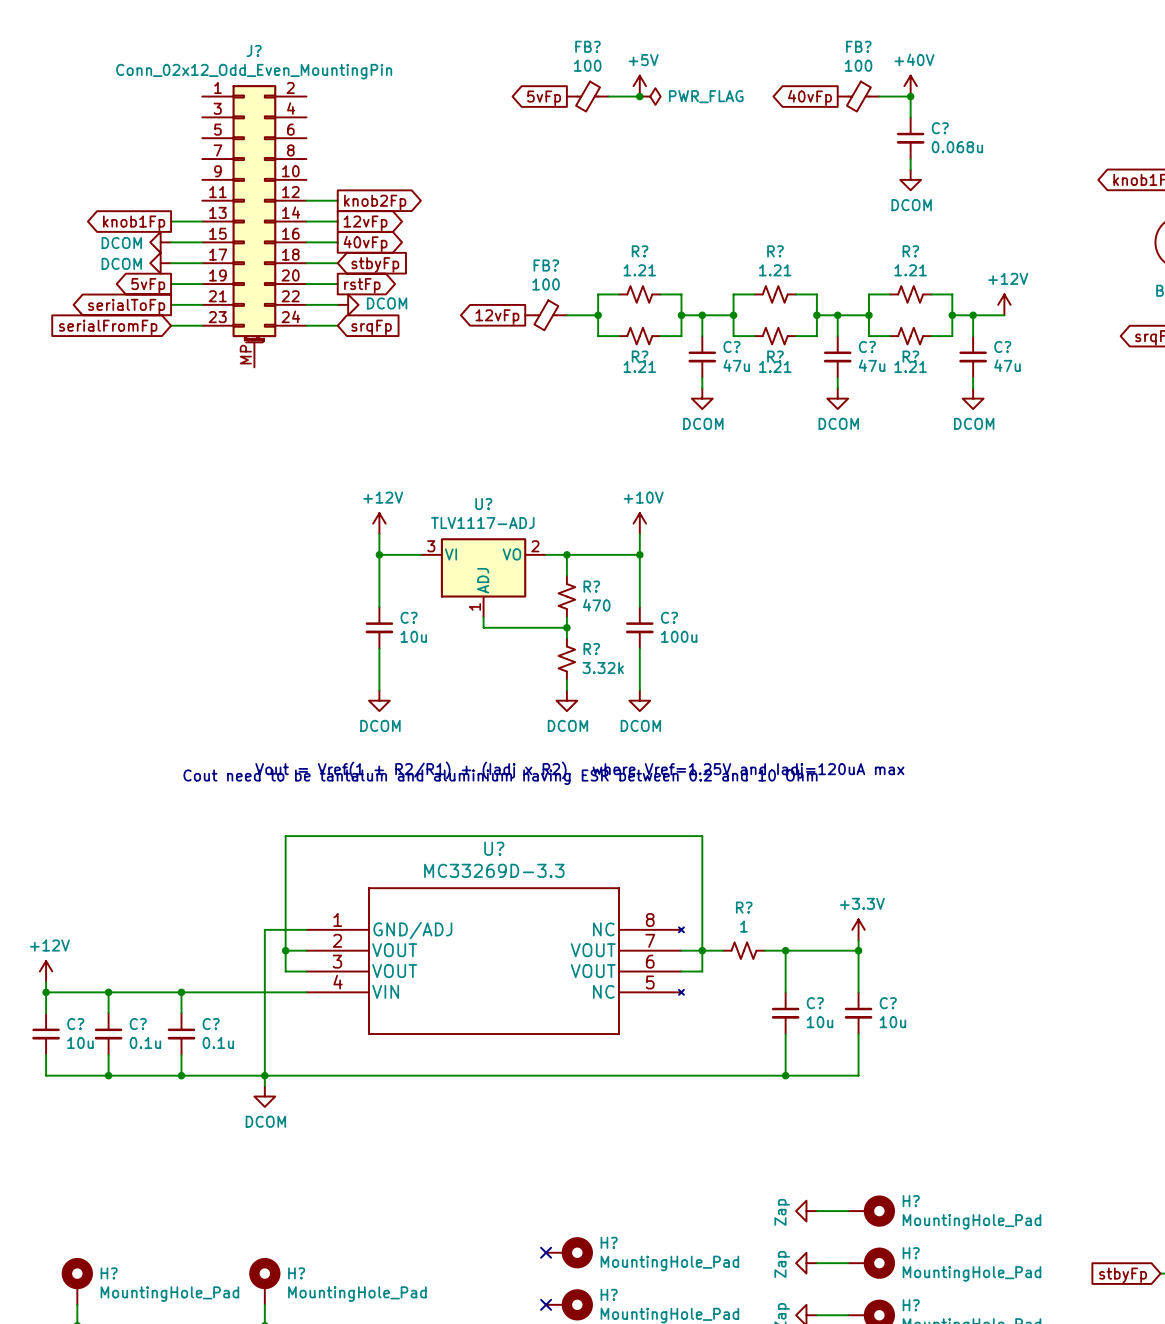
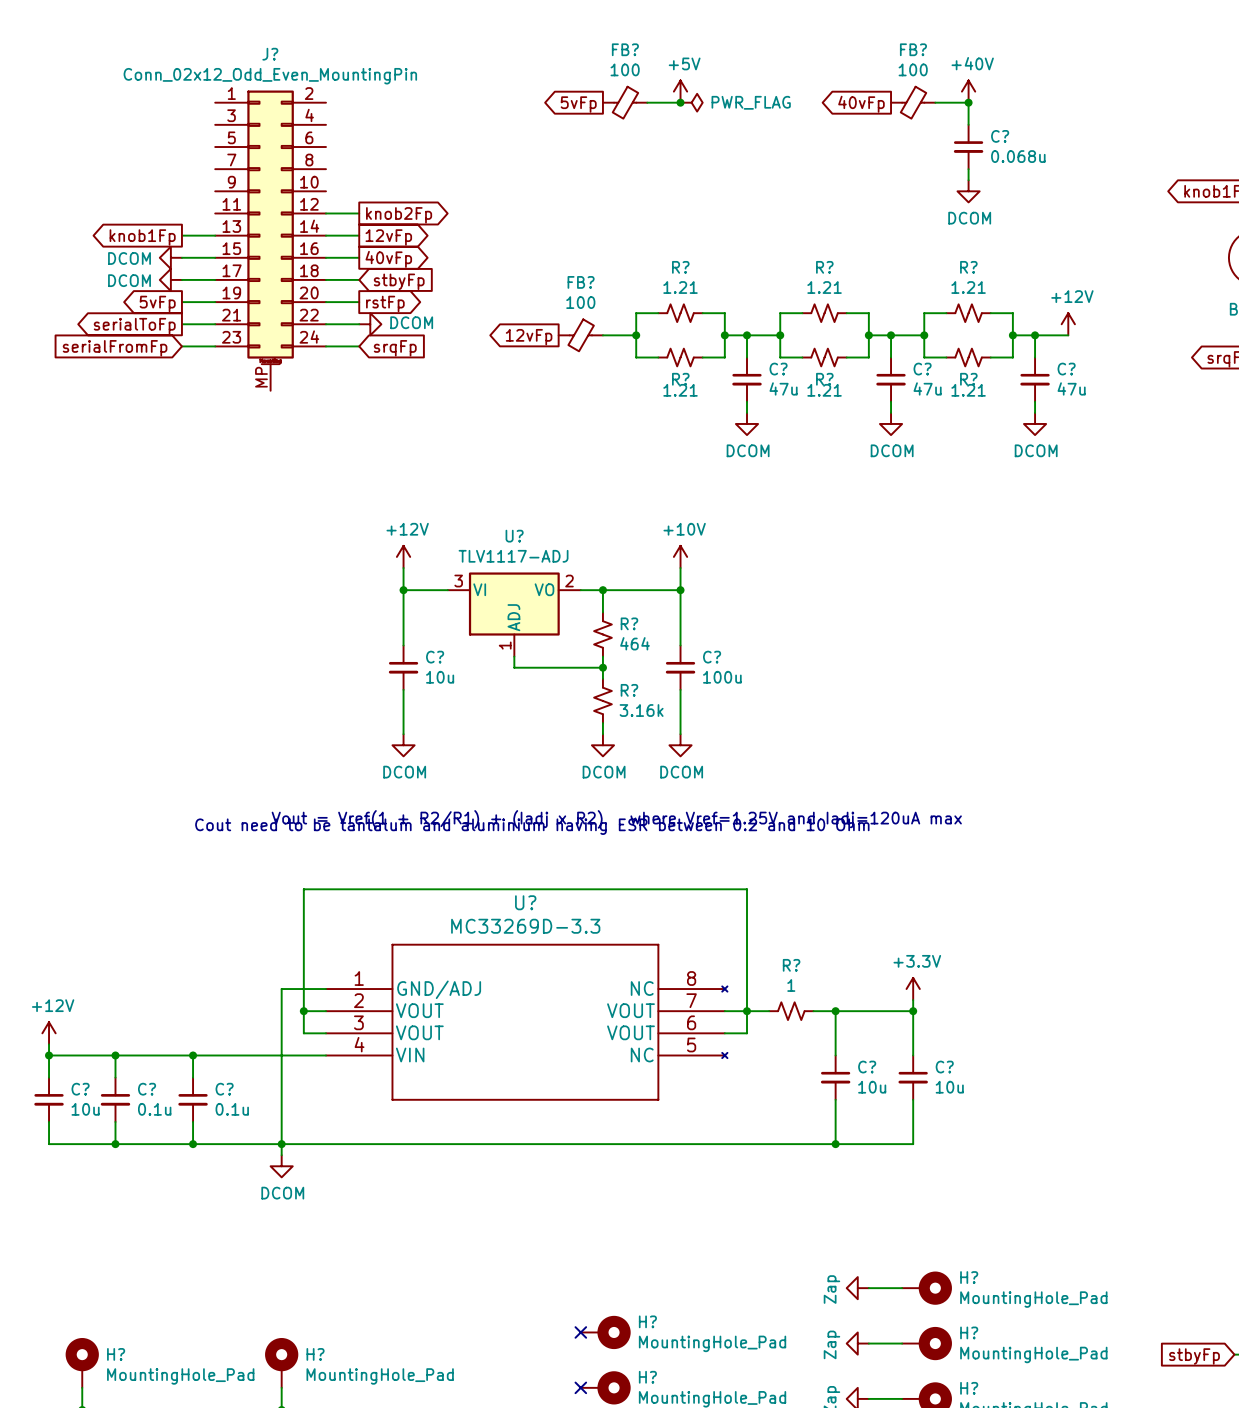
R? value: 470 (596, 605) -> 464 (635, 643)
R? value: 3.32k (603, 668) -> 3.16k (641, 710)

